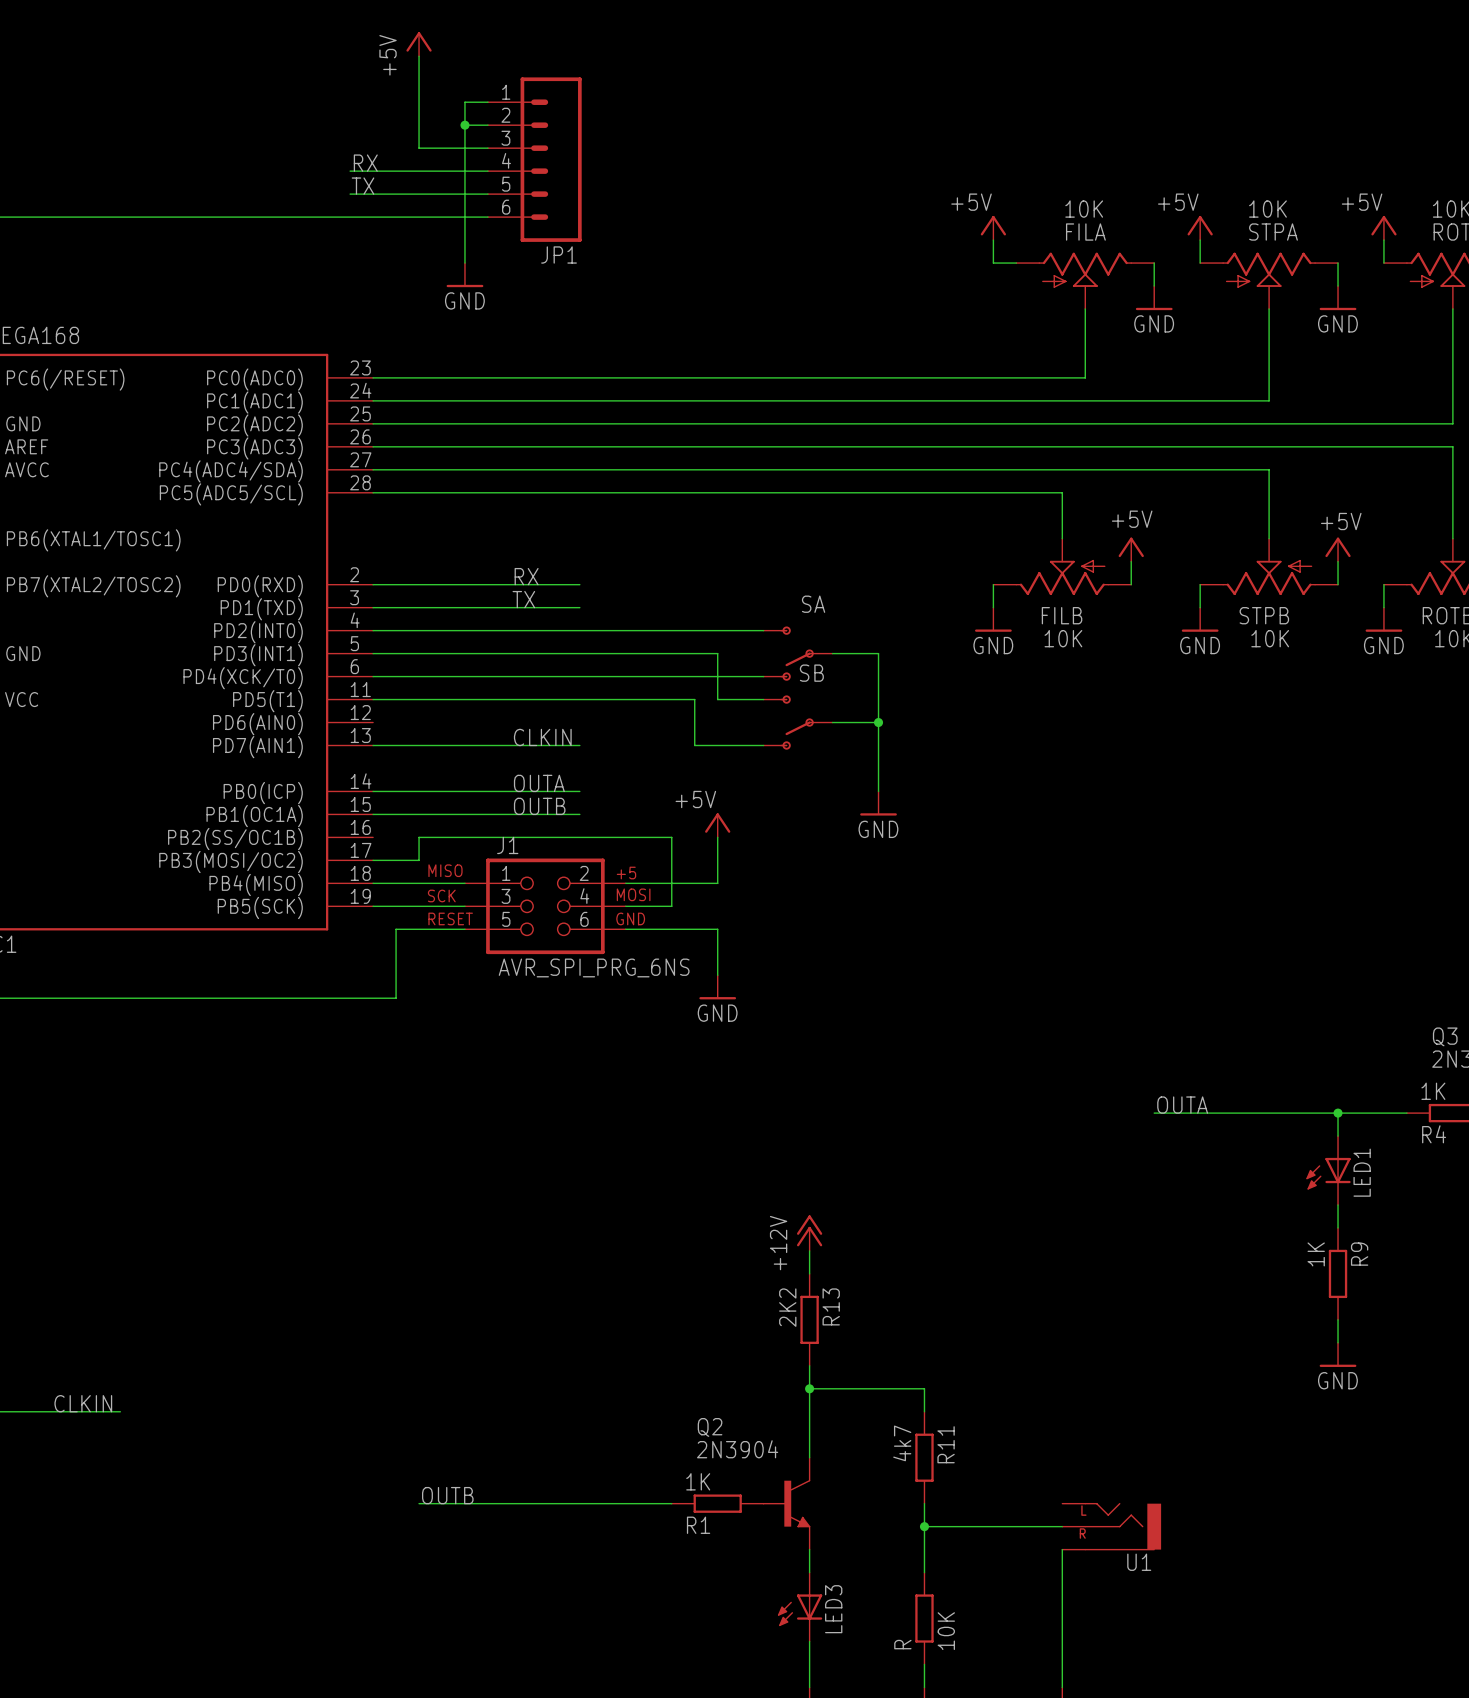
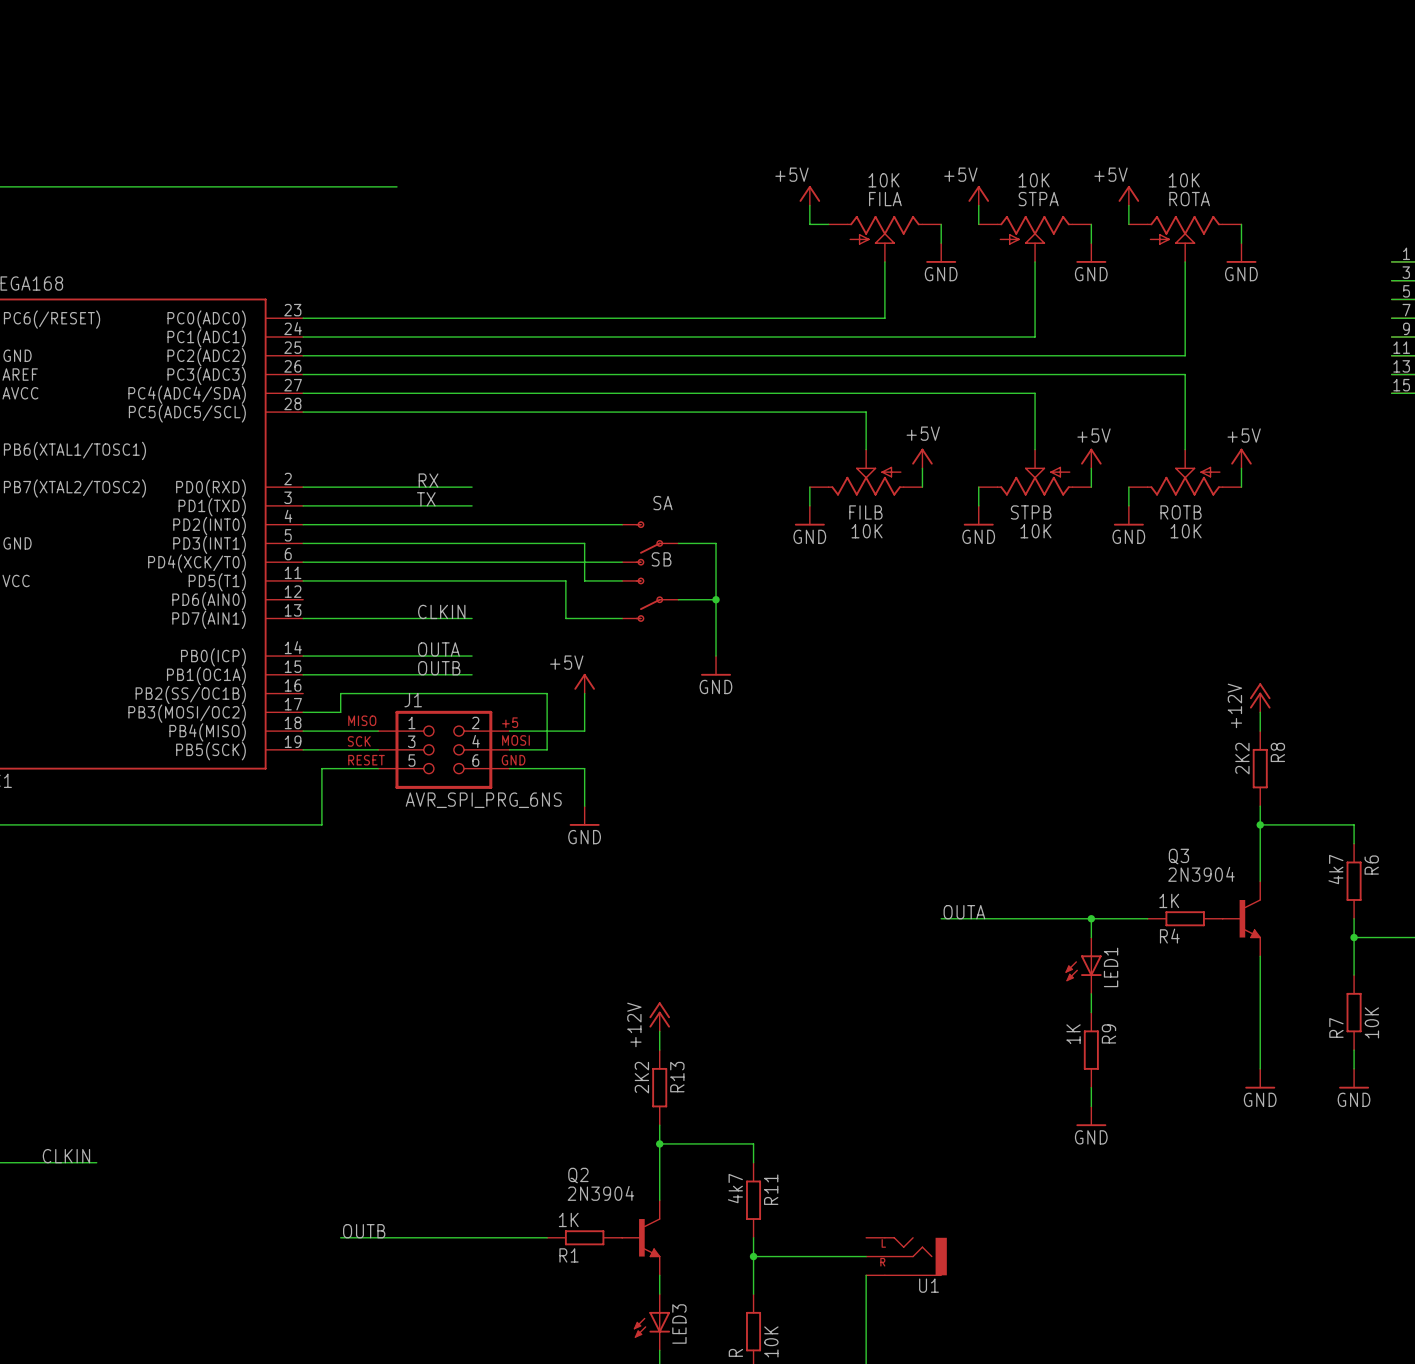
power symbol: +5V (419, 44) -> none
wire: (419, 56) (419, 148) (487, 148) -> none
wire: (487, 102) (464, 102) (464, 263) -> none
wire: (464, 125) (487, 125) -> none
junction: (464, 125) -> none
JP1: (534, 159) -> none
label: RX (365, 163) -> none
wire: (350, 171) (487, 171) -> none
label: TX (363, 186) -> none
wire: (350, 194) (487, 194) -> none
power symbol: GND (464, 275) -> none

